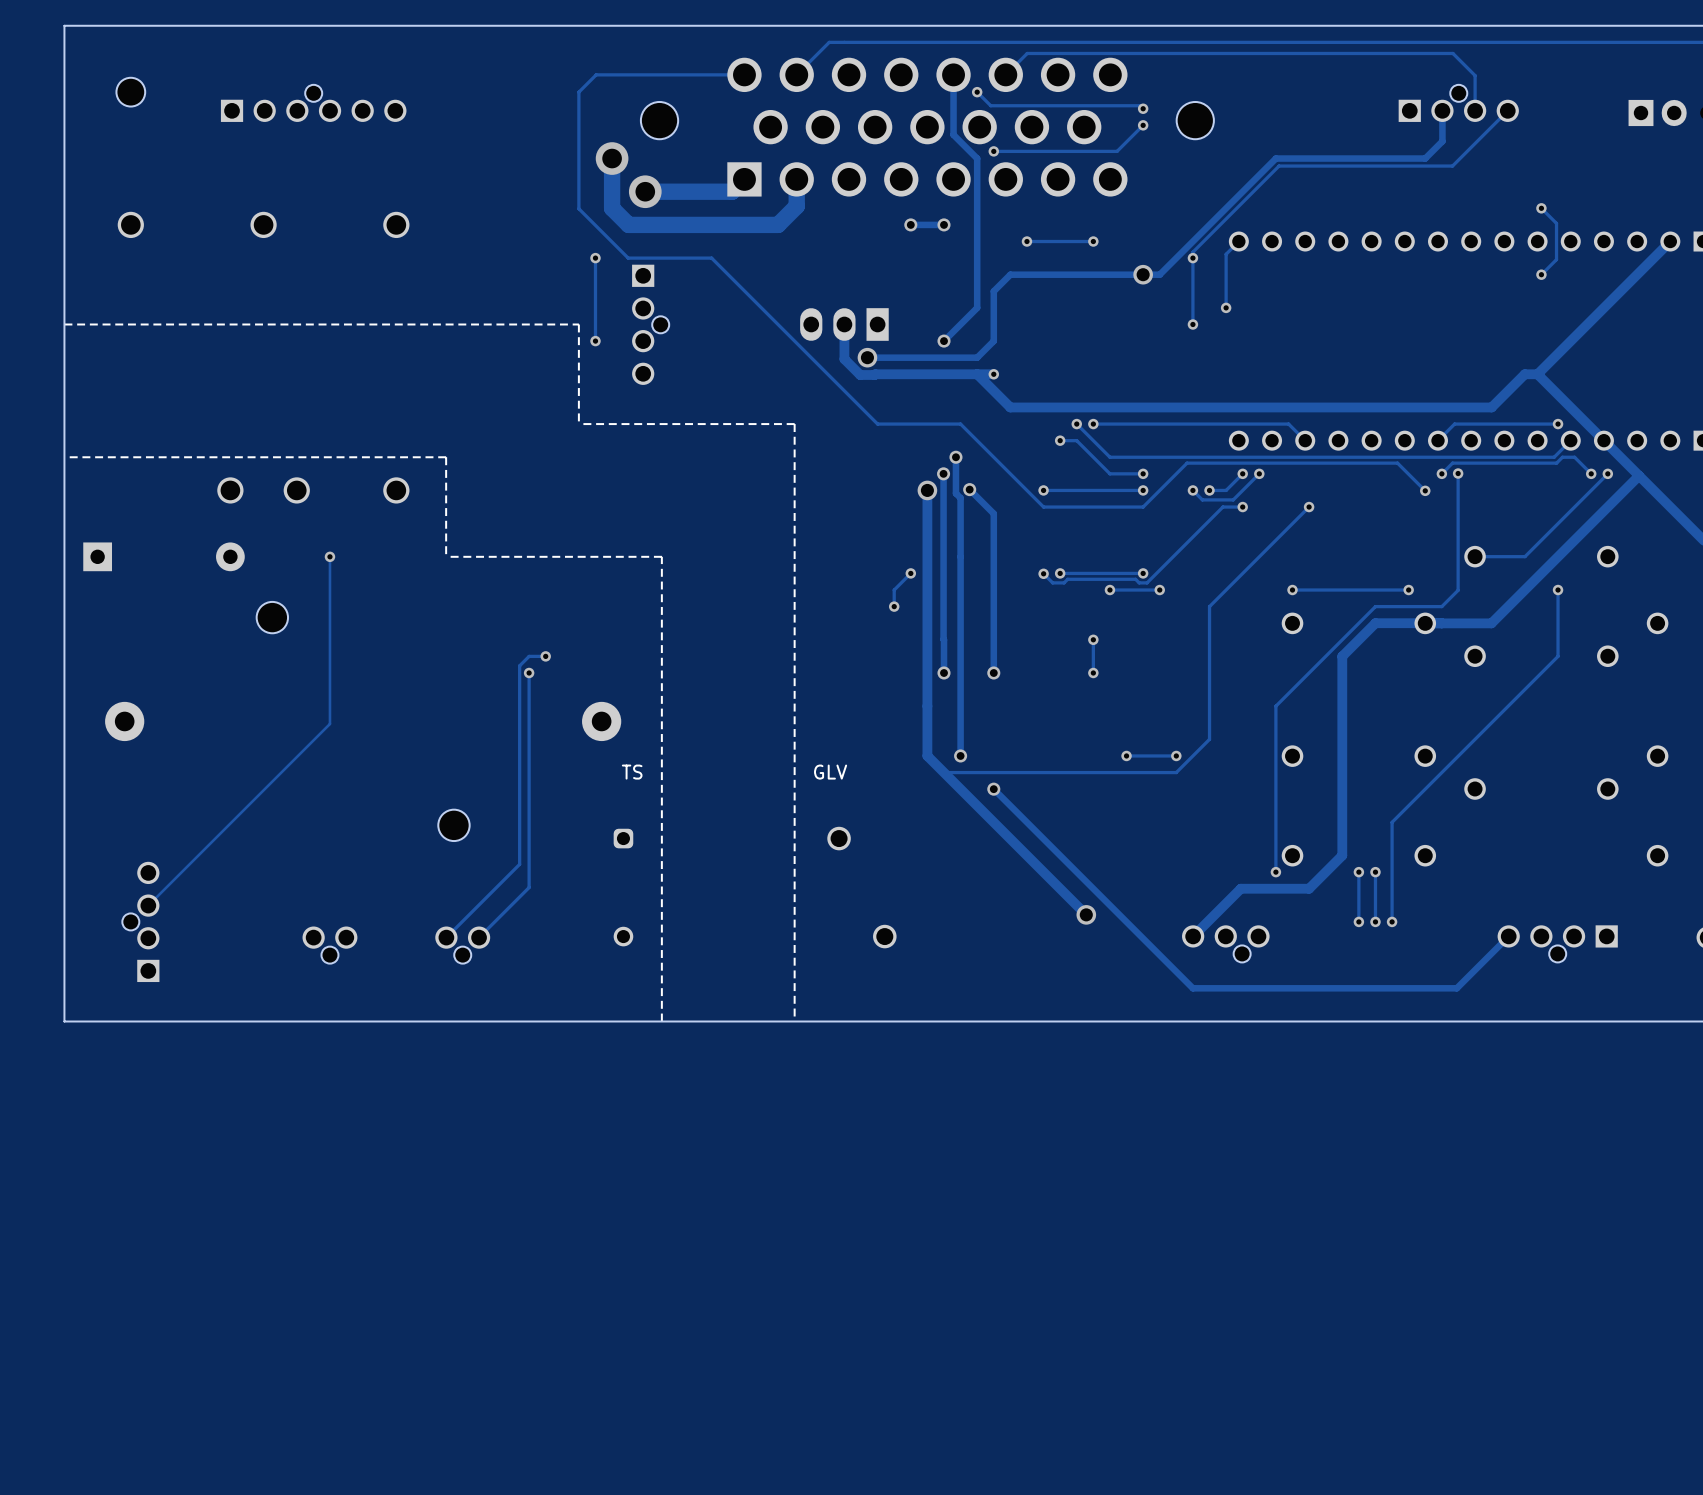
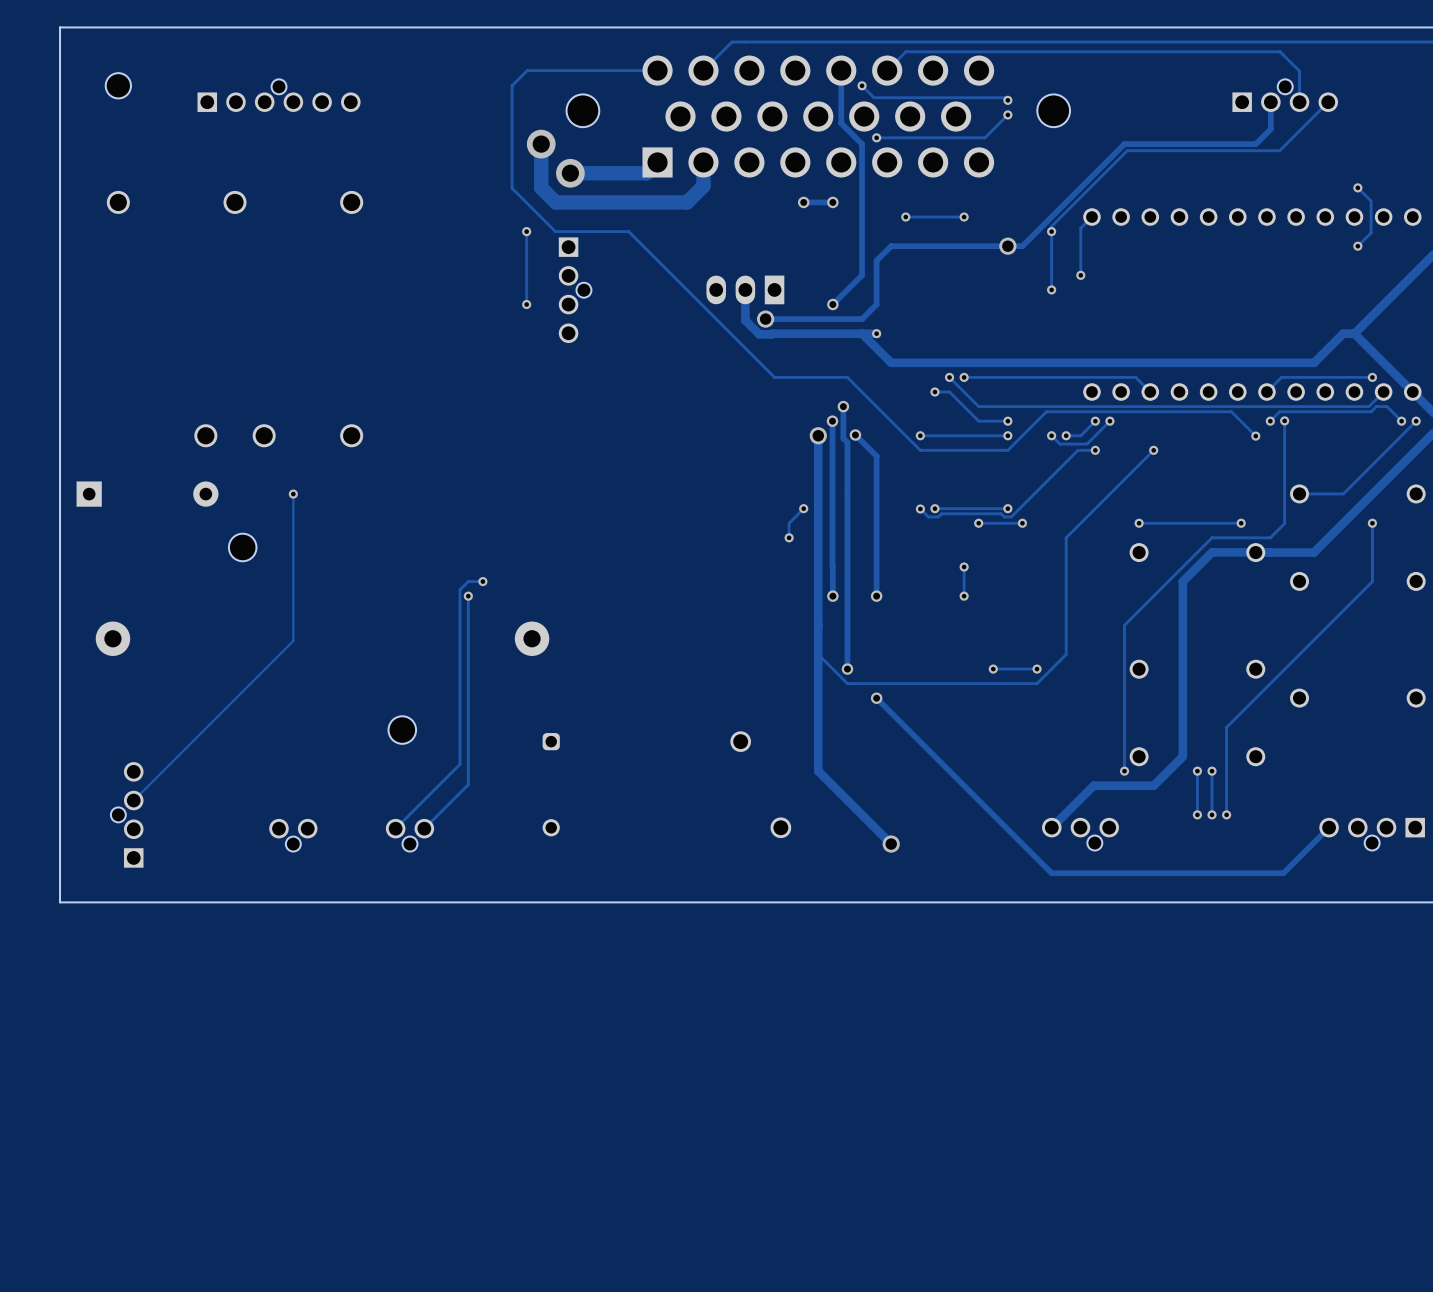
line: (64, 324) (578, 324) (578, 424) (794, 424) (794, 1021) -> none
line: (64, 457) (446, 457) (446, 556) (661, 556) (661, 1021) -> none
track: none -> (818, 669) (818, 771) (891, 844)
text: TS (632, 772) -> none
text: GLV (830, 772) -> none
track: (960, 772) (944, 772) (927, 755) (1086, 914) -> (847, 683) (818, 654) (818, 625)
via: (1086, 914) -> none
via: none -> (891, 844)

